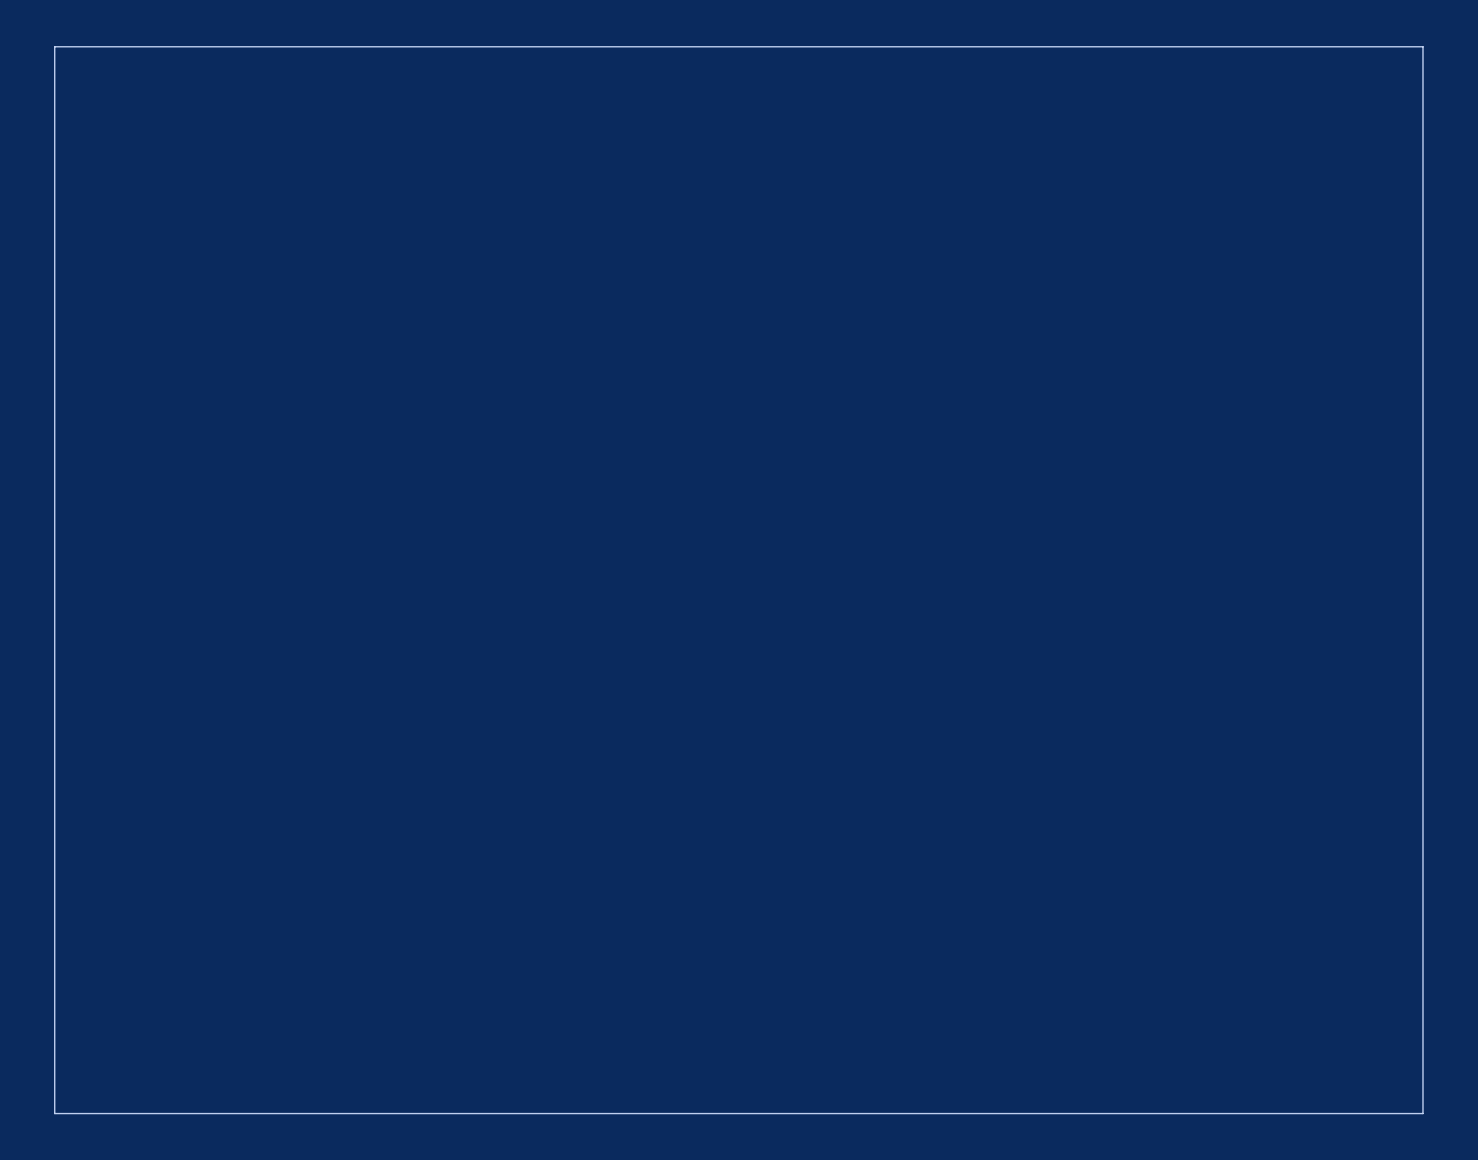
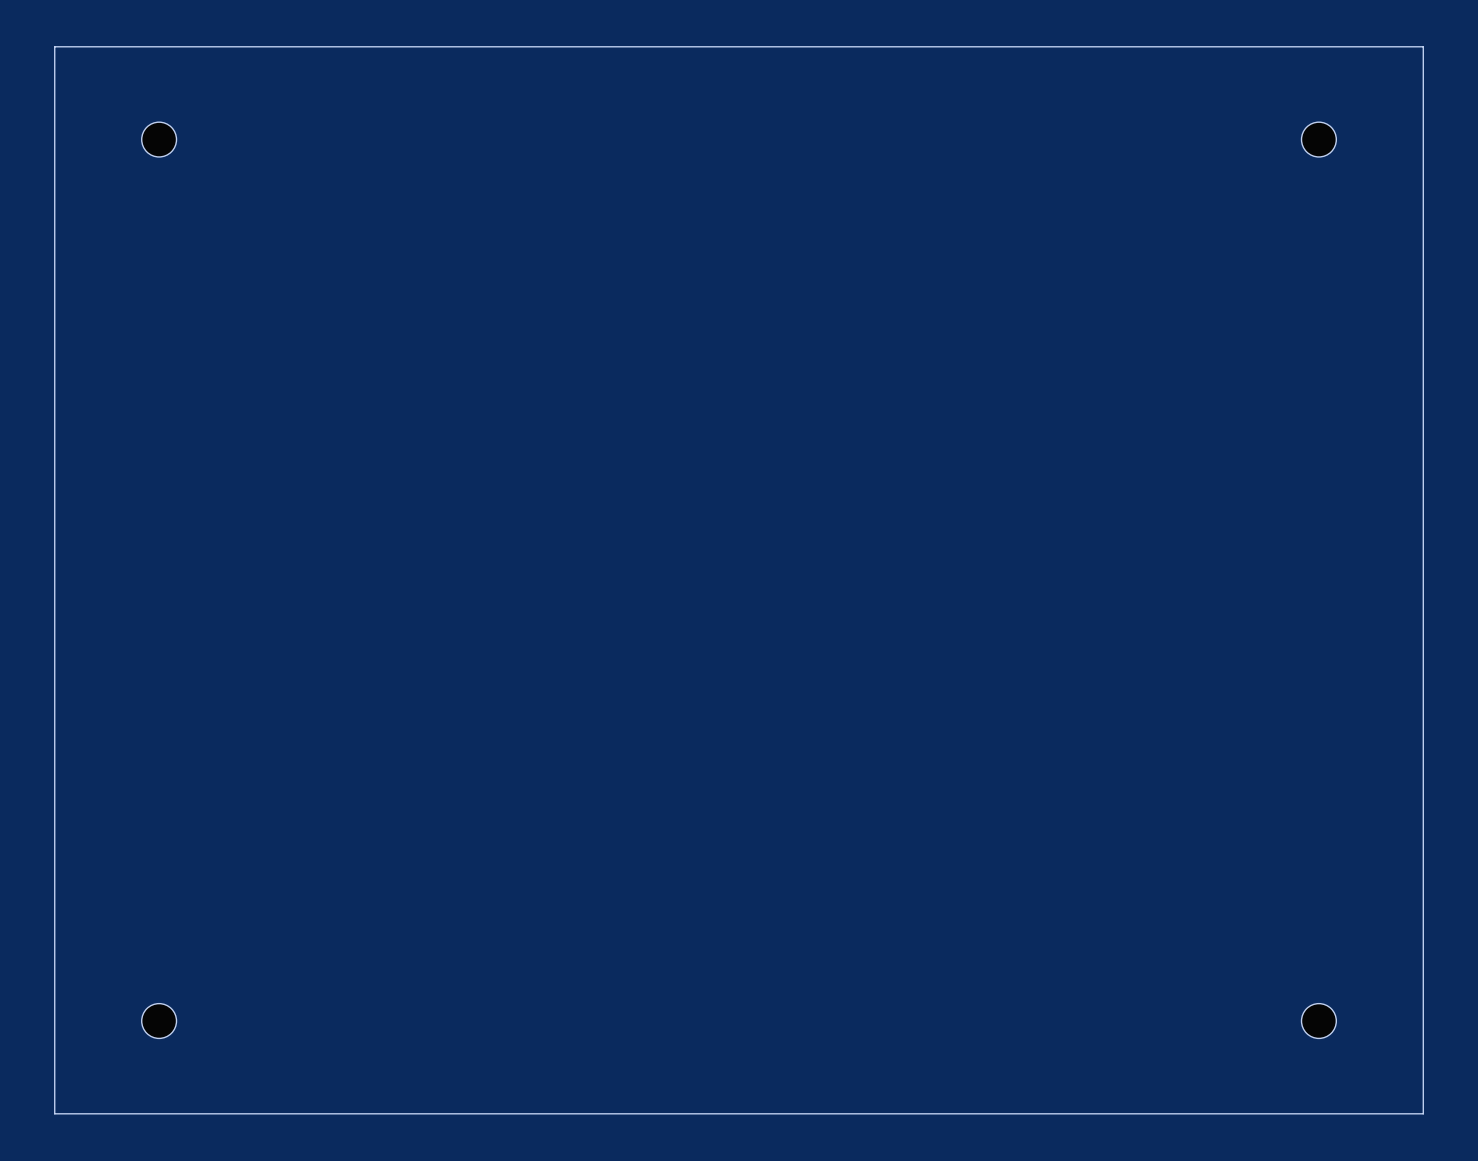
part: none -> (159, 139)
part: none -> (1318, 139)
part: none -> (159, 1021)
part: none -> (1318, 1021)

